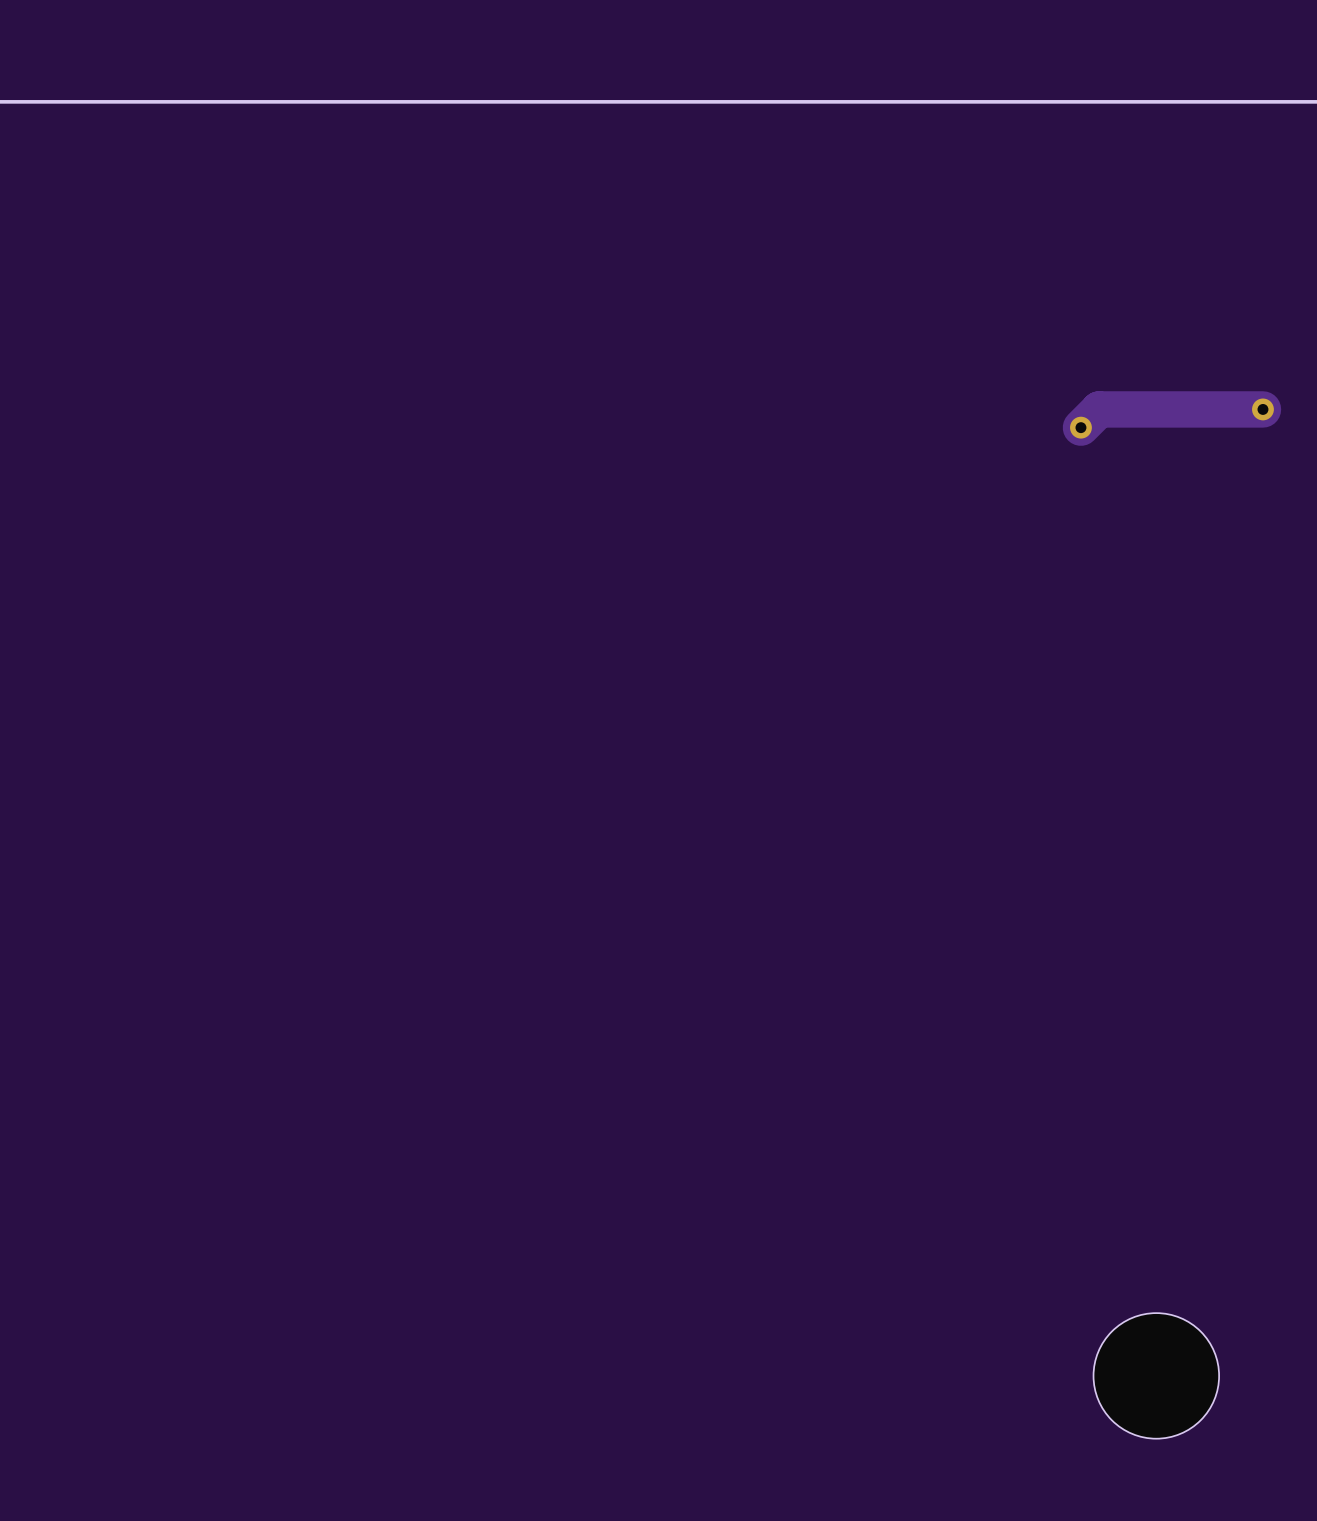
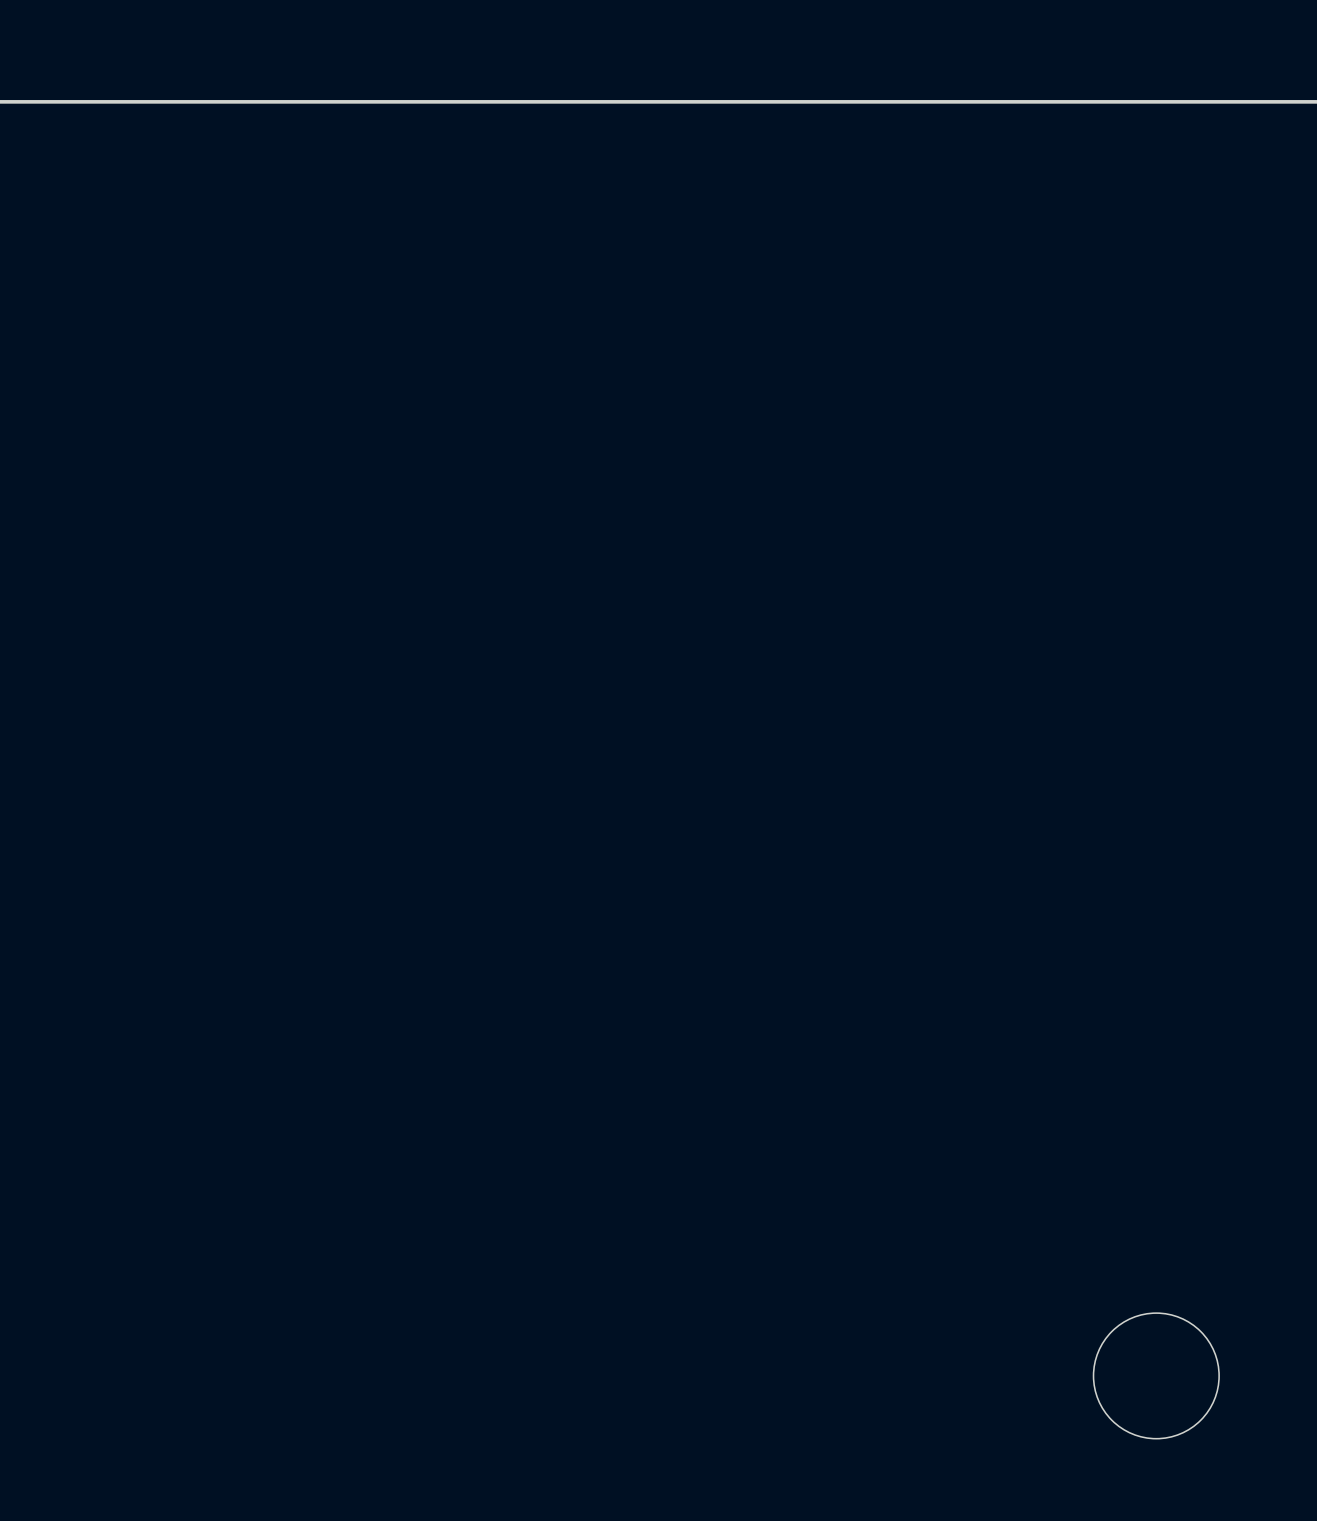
track: (1262, 409) (1099, 409) (1080, 427) -> none
via: (1262, 409) -> none
via: (1080, 427) -> none

